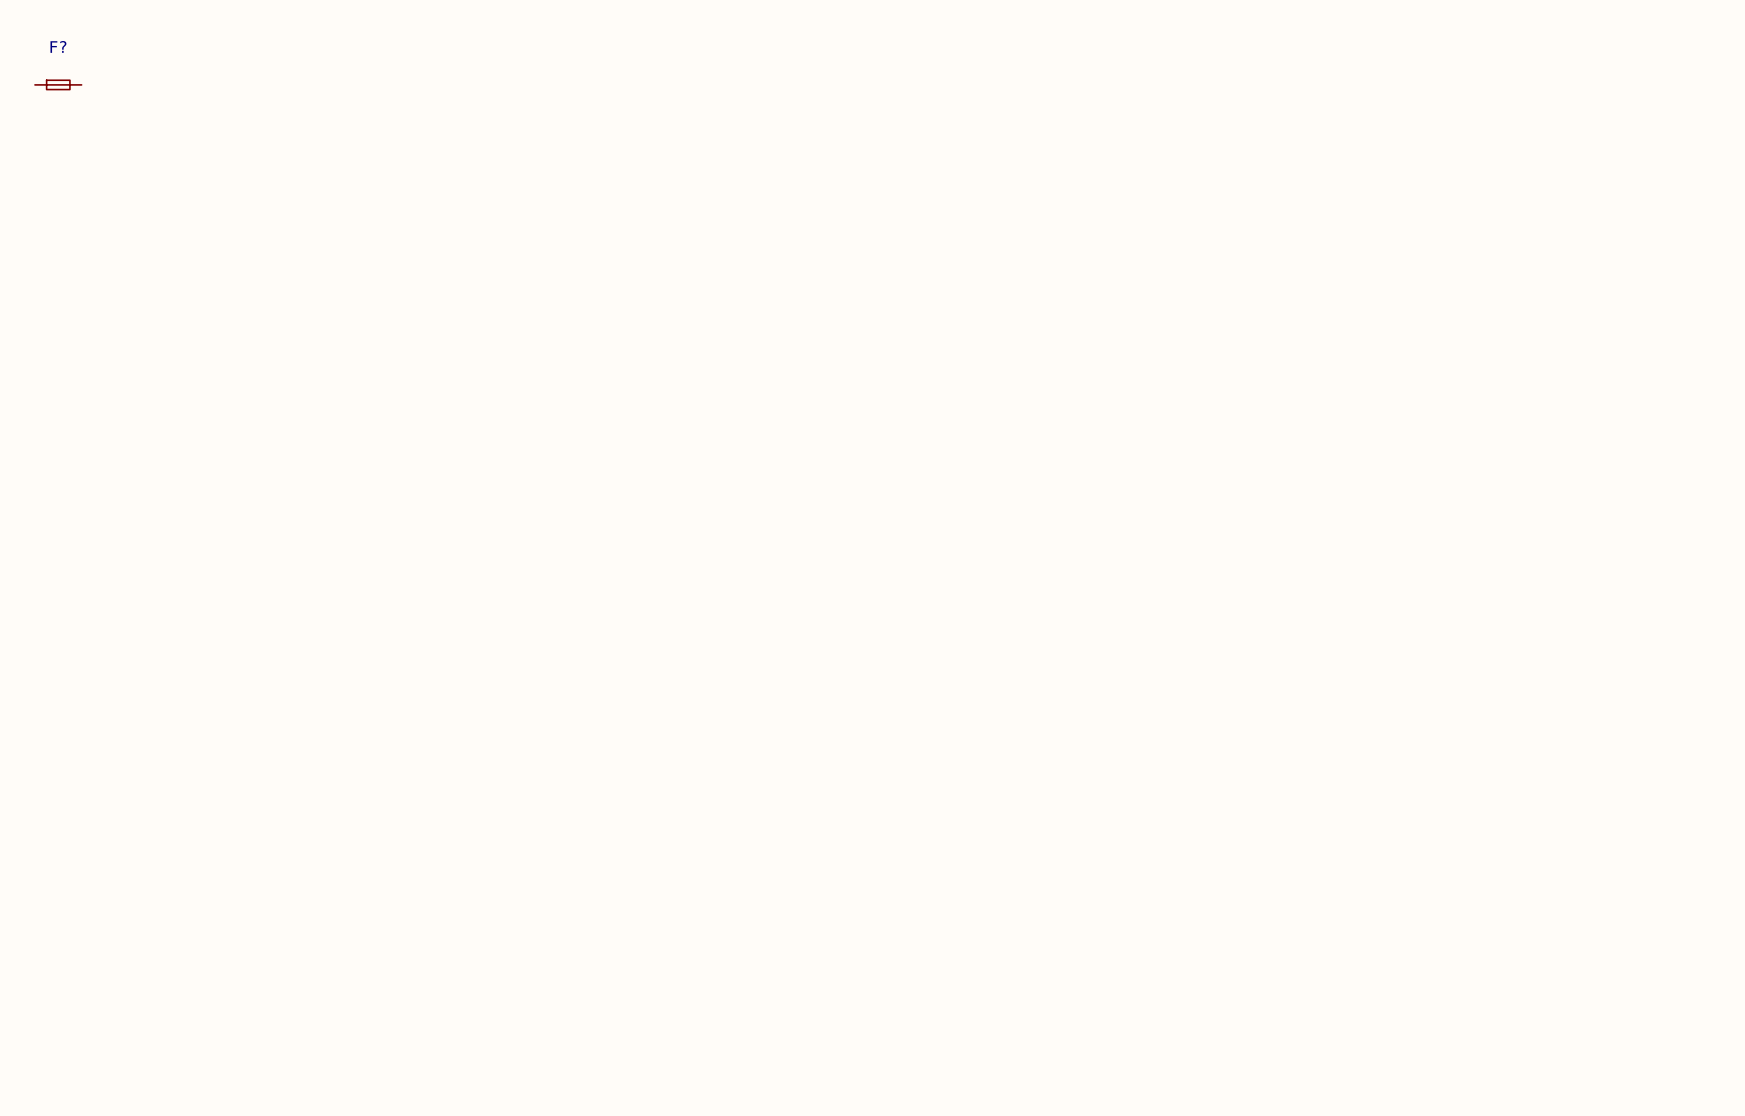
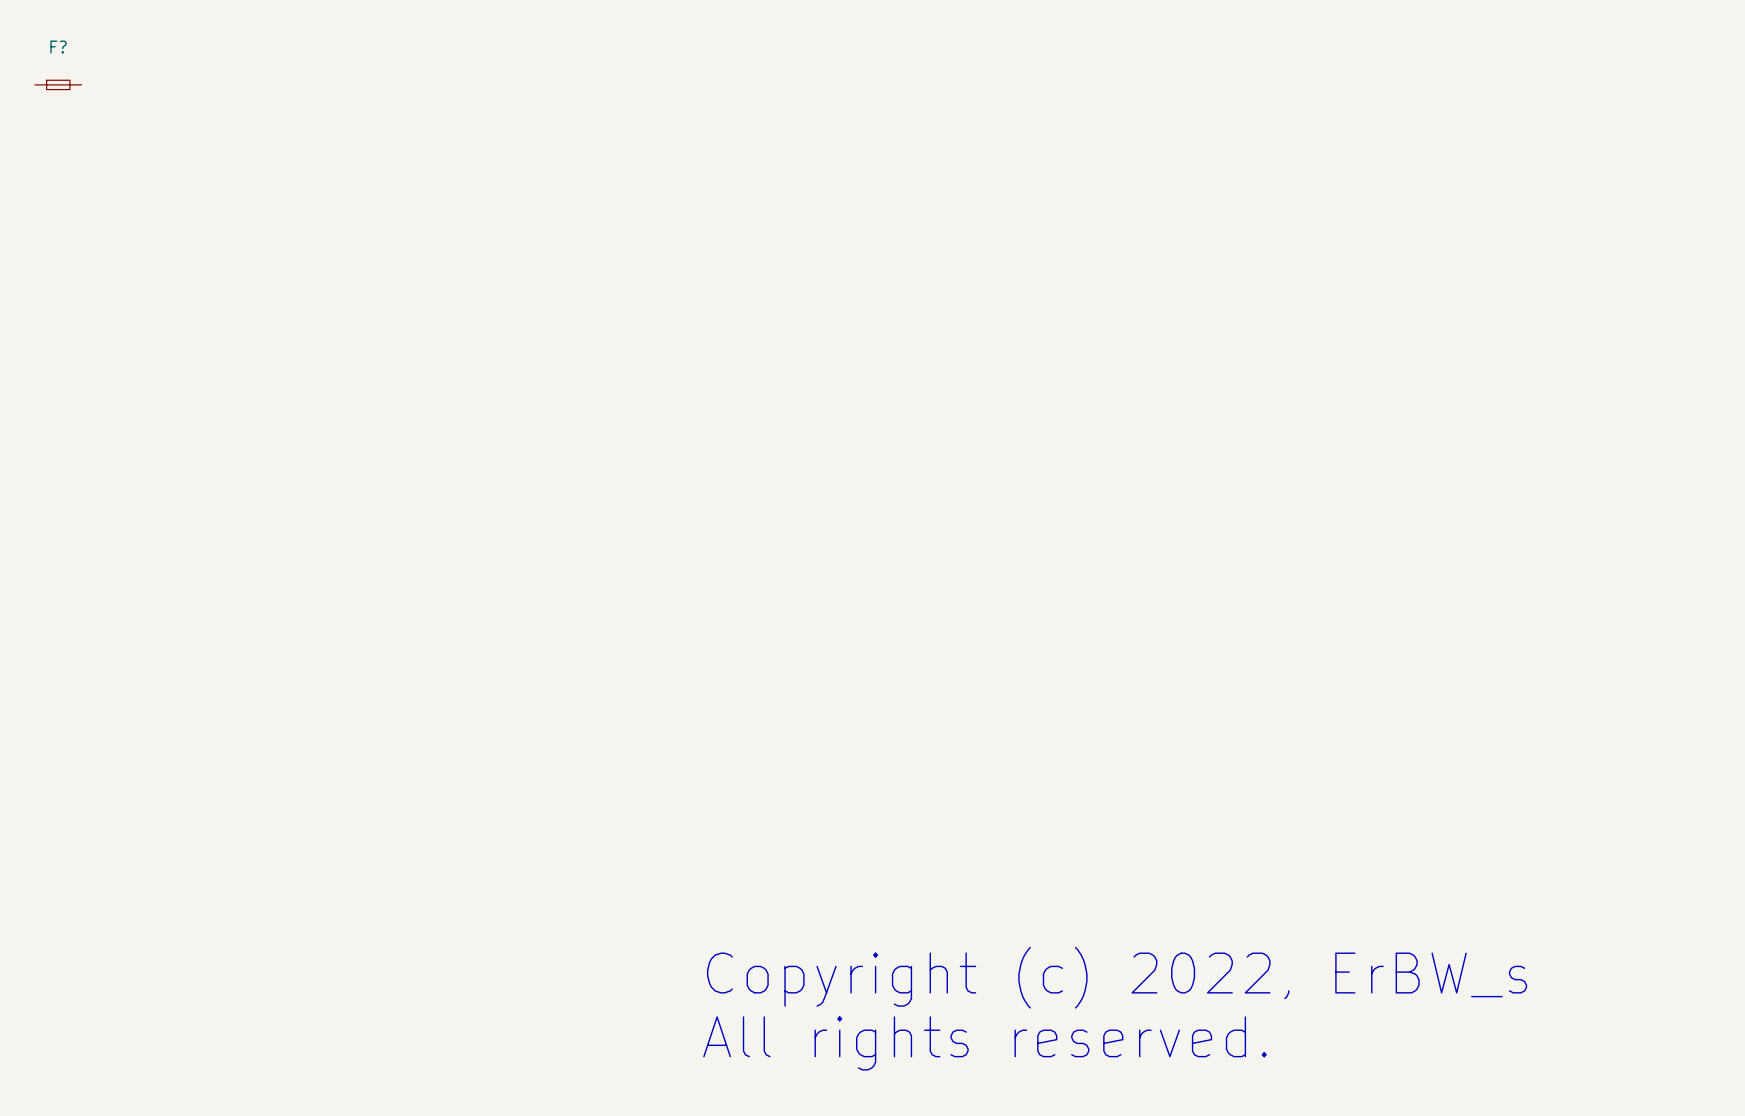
text: none -> Copyright (c) 2022, ErBW_s (1117, 977)
text: none -> All rights reserved. (985, 1043)

